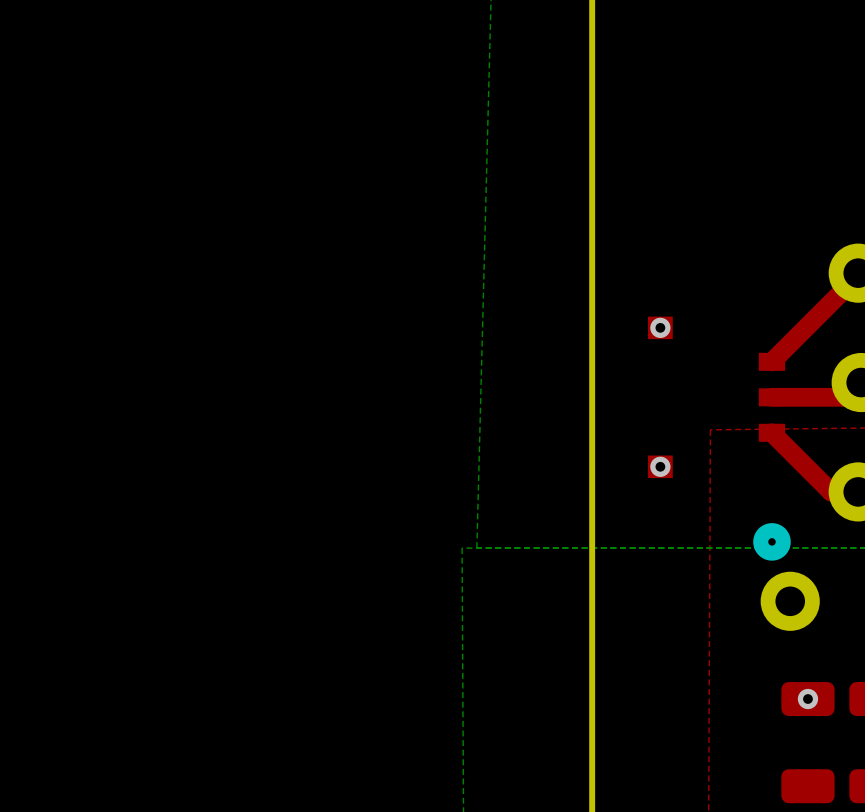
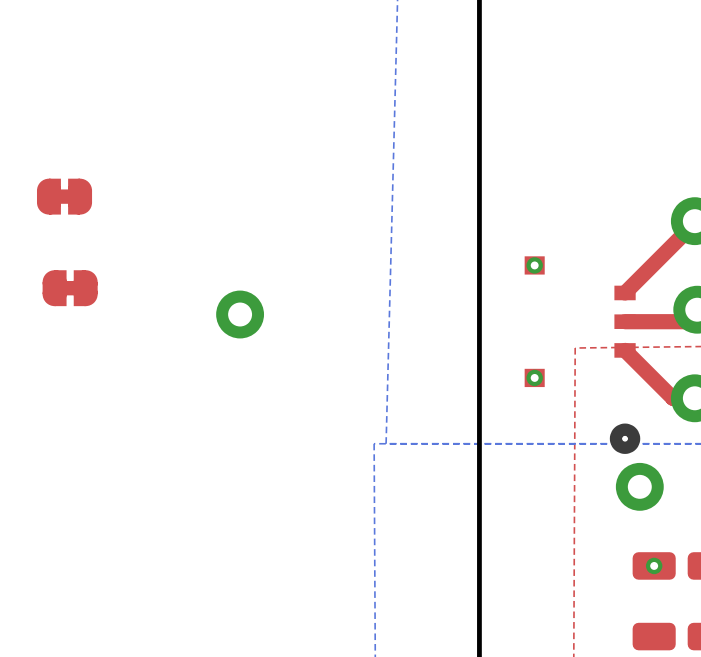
part: none -> (64, 196)
part: none -> (70, 288)
part: none -> (240, 314)

